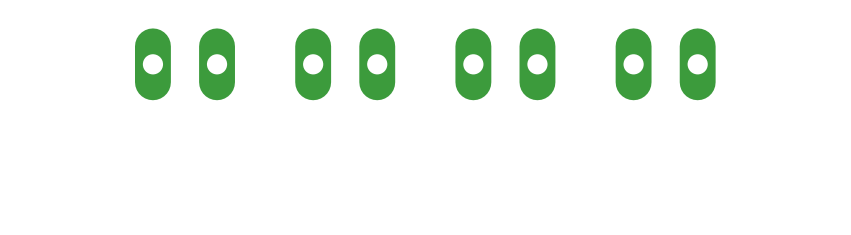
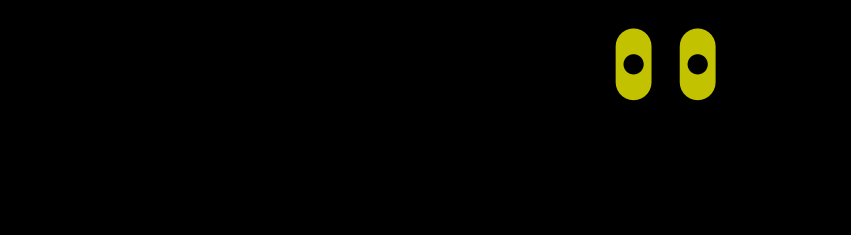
part: (184, 64) -> none
part: (345, 64) -> none
part: (505, 64) -> none

